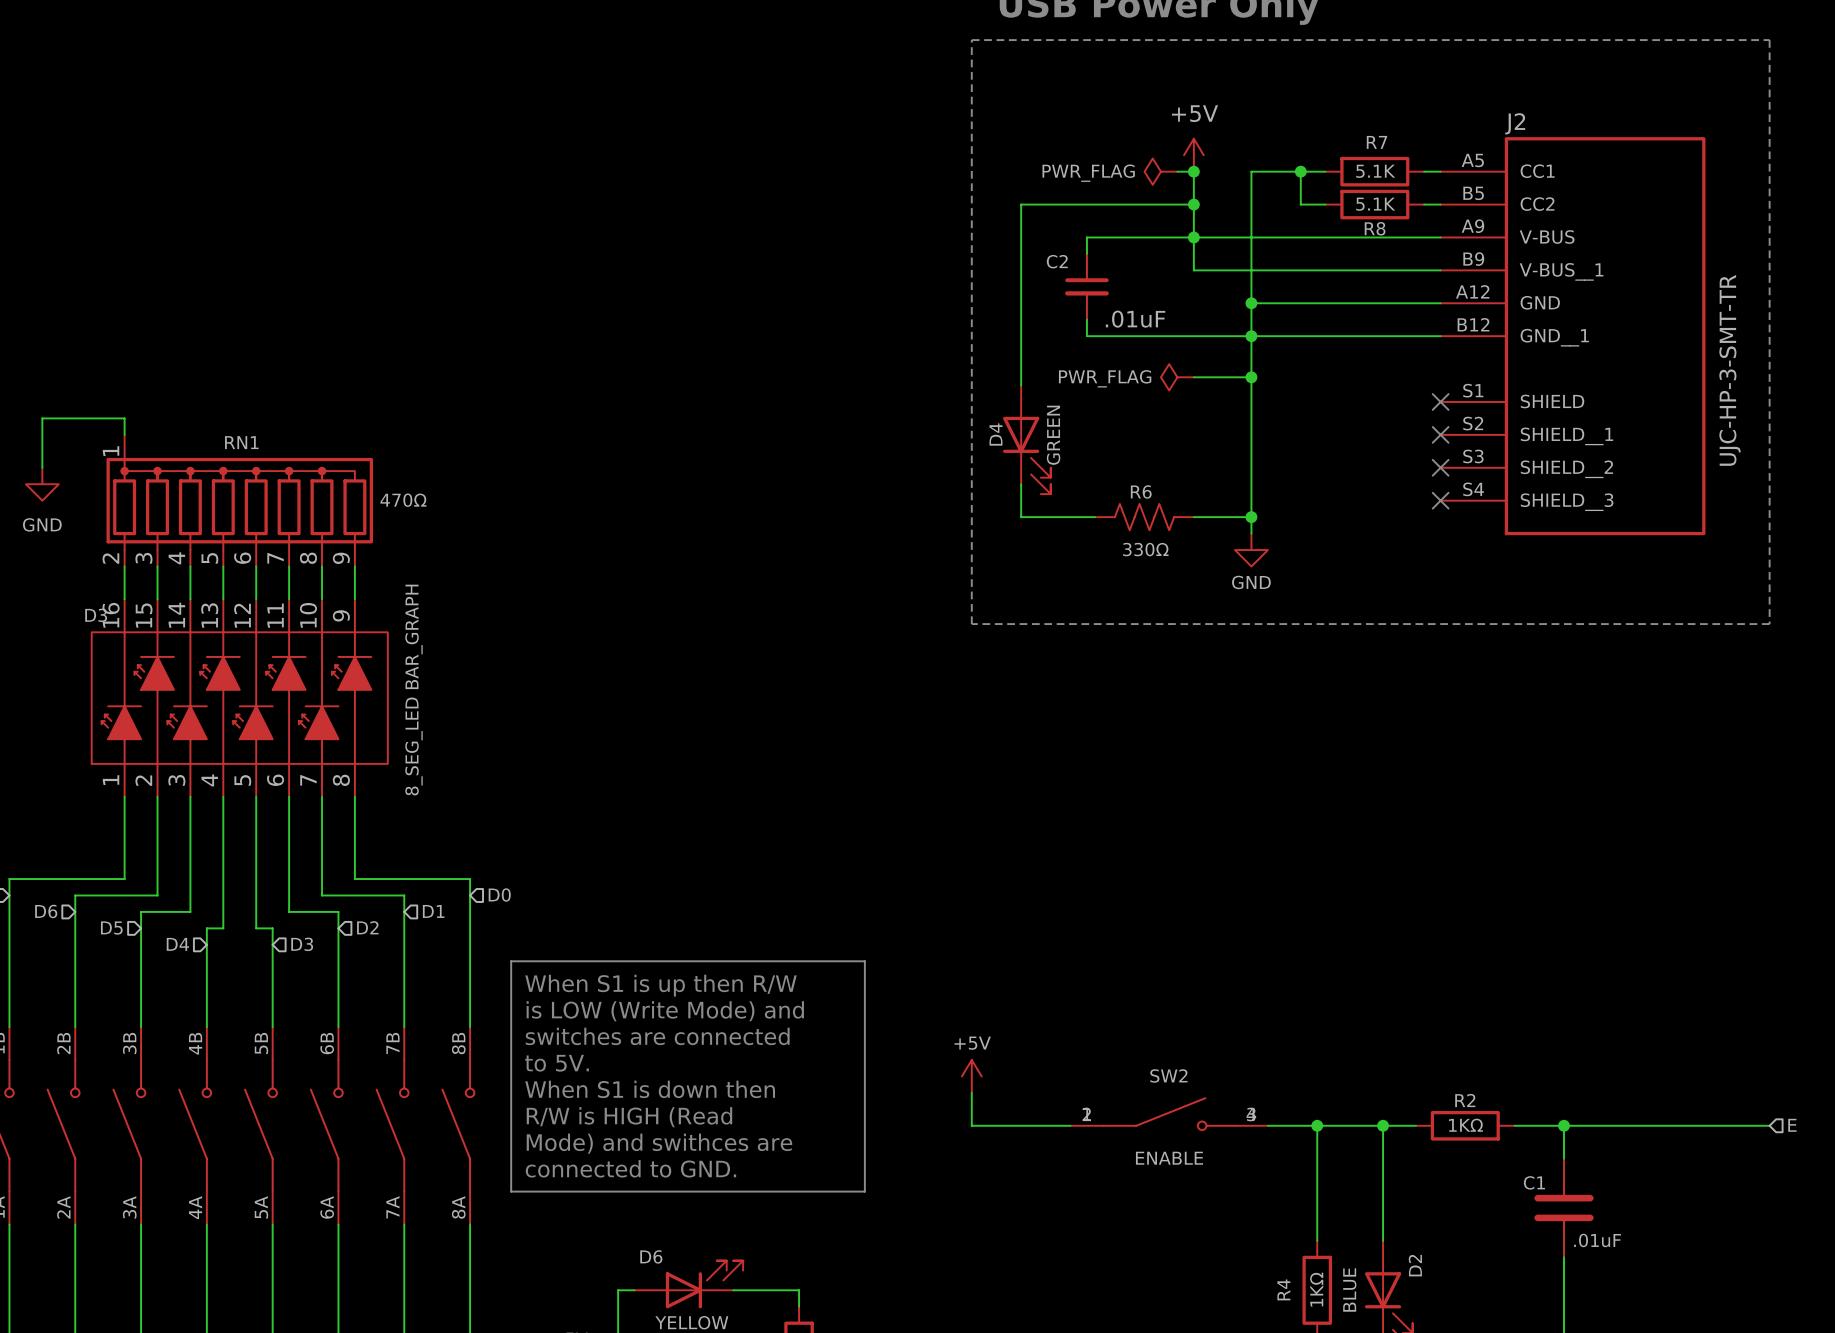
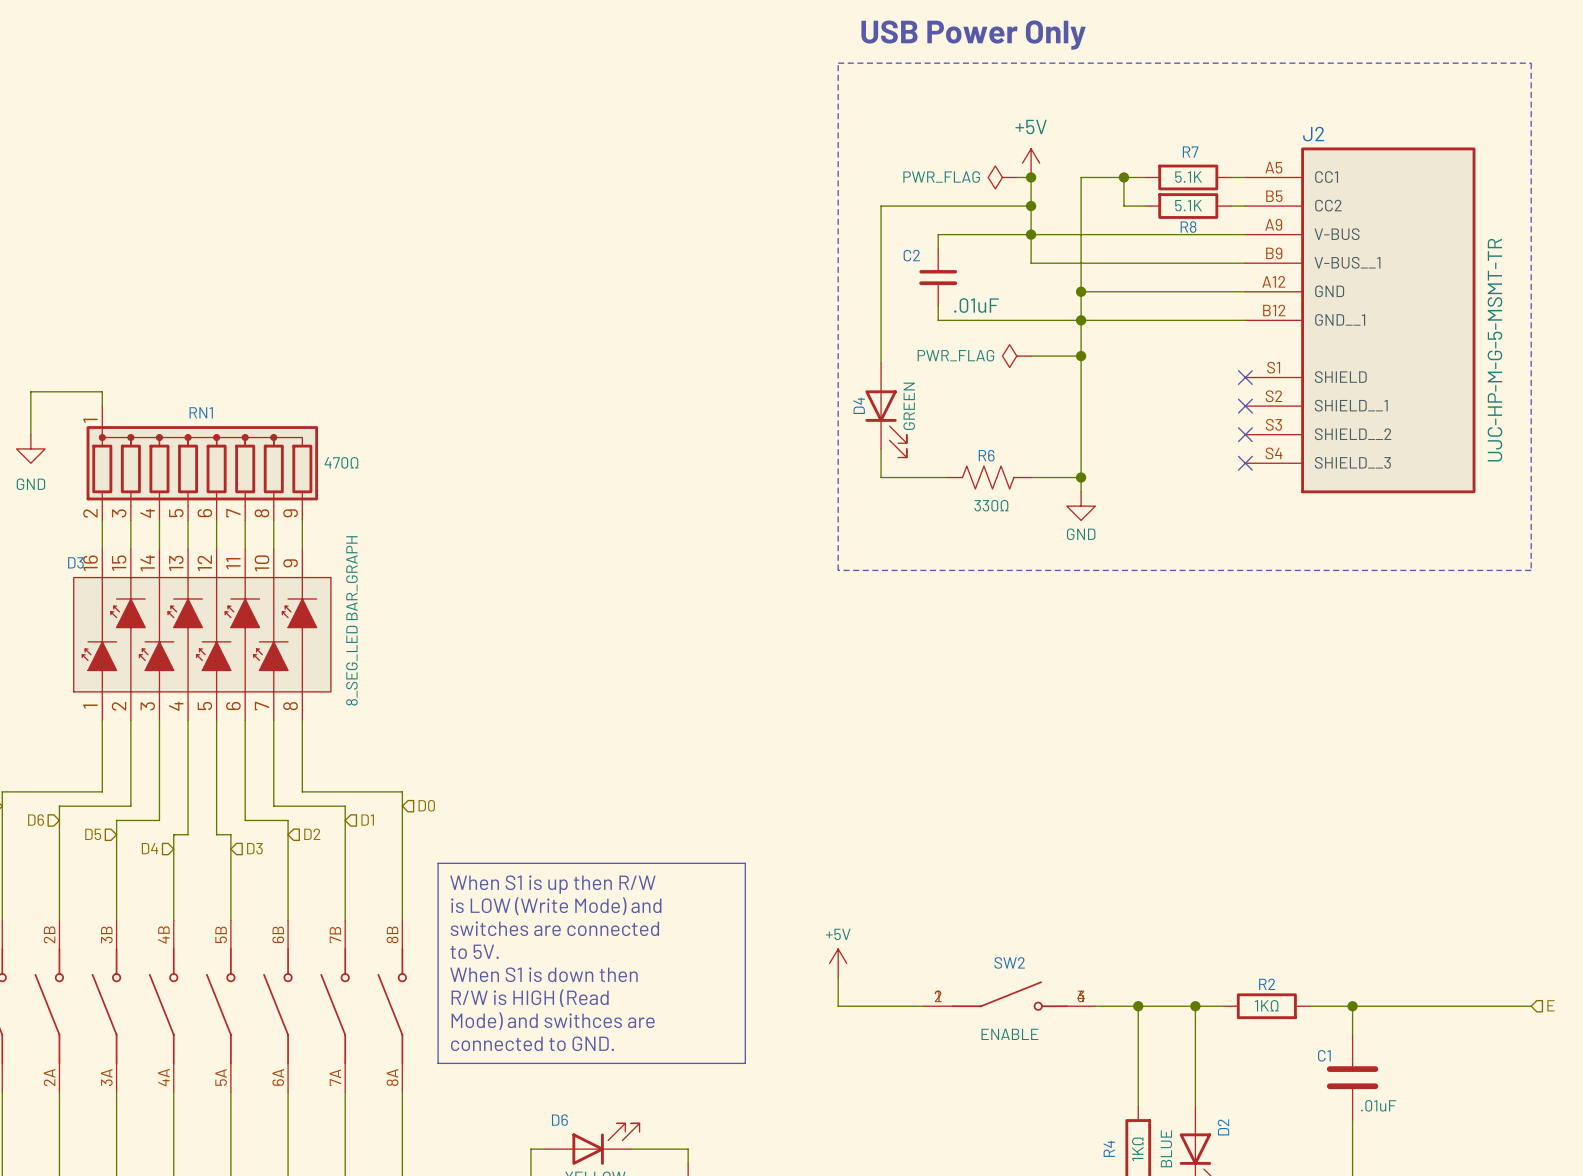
J2 value: UJC-HP-3-SMT-TR (1730, 370) -> UJC-HP-M-G-5-MSMT-TR (1494, 350)

